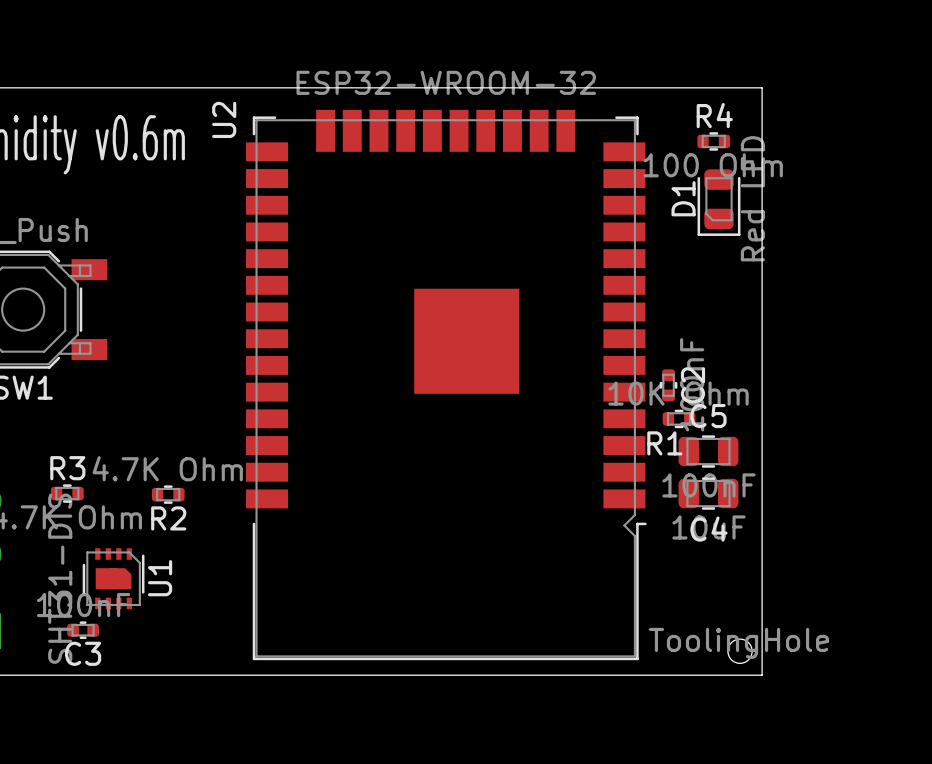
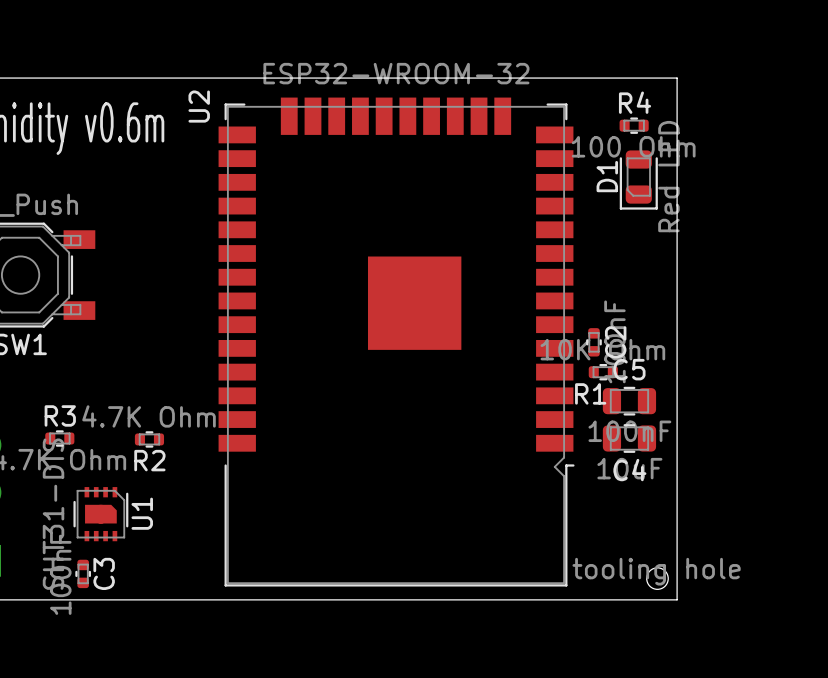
C3 rotation: 0° (83, 630) -> 90° clockwise (83, 573)
part value: ToolingHole (739, 643) -> tooling hole (656, 571)

